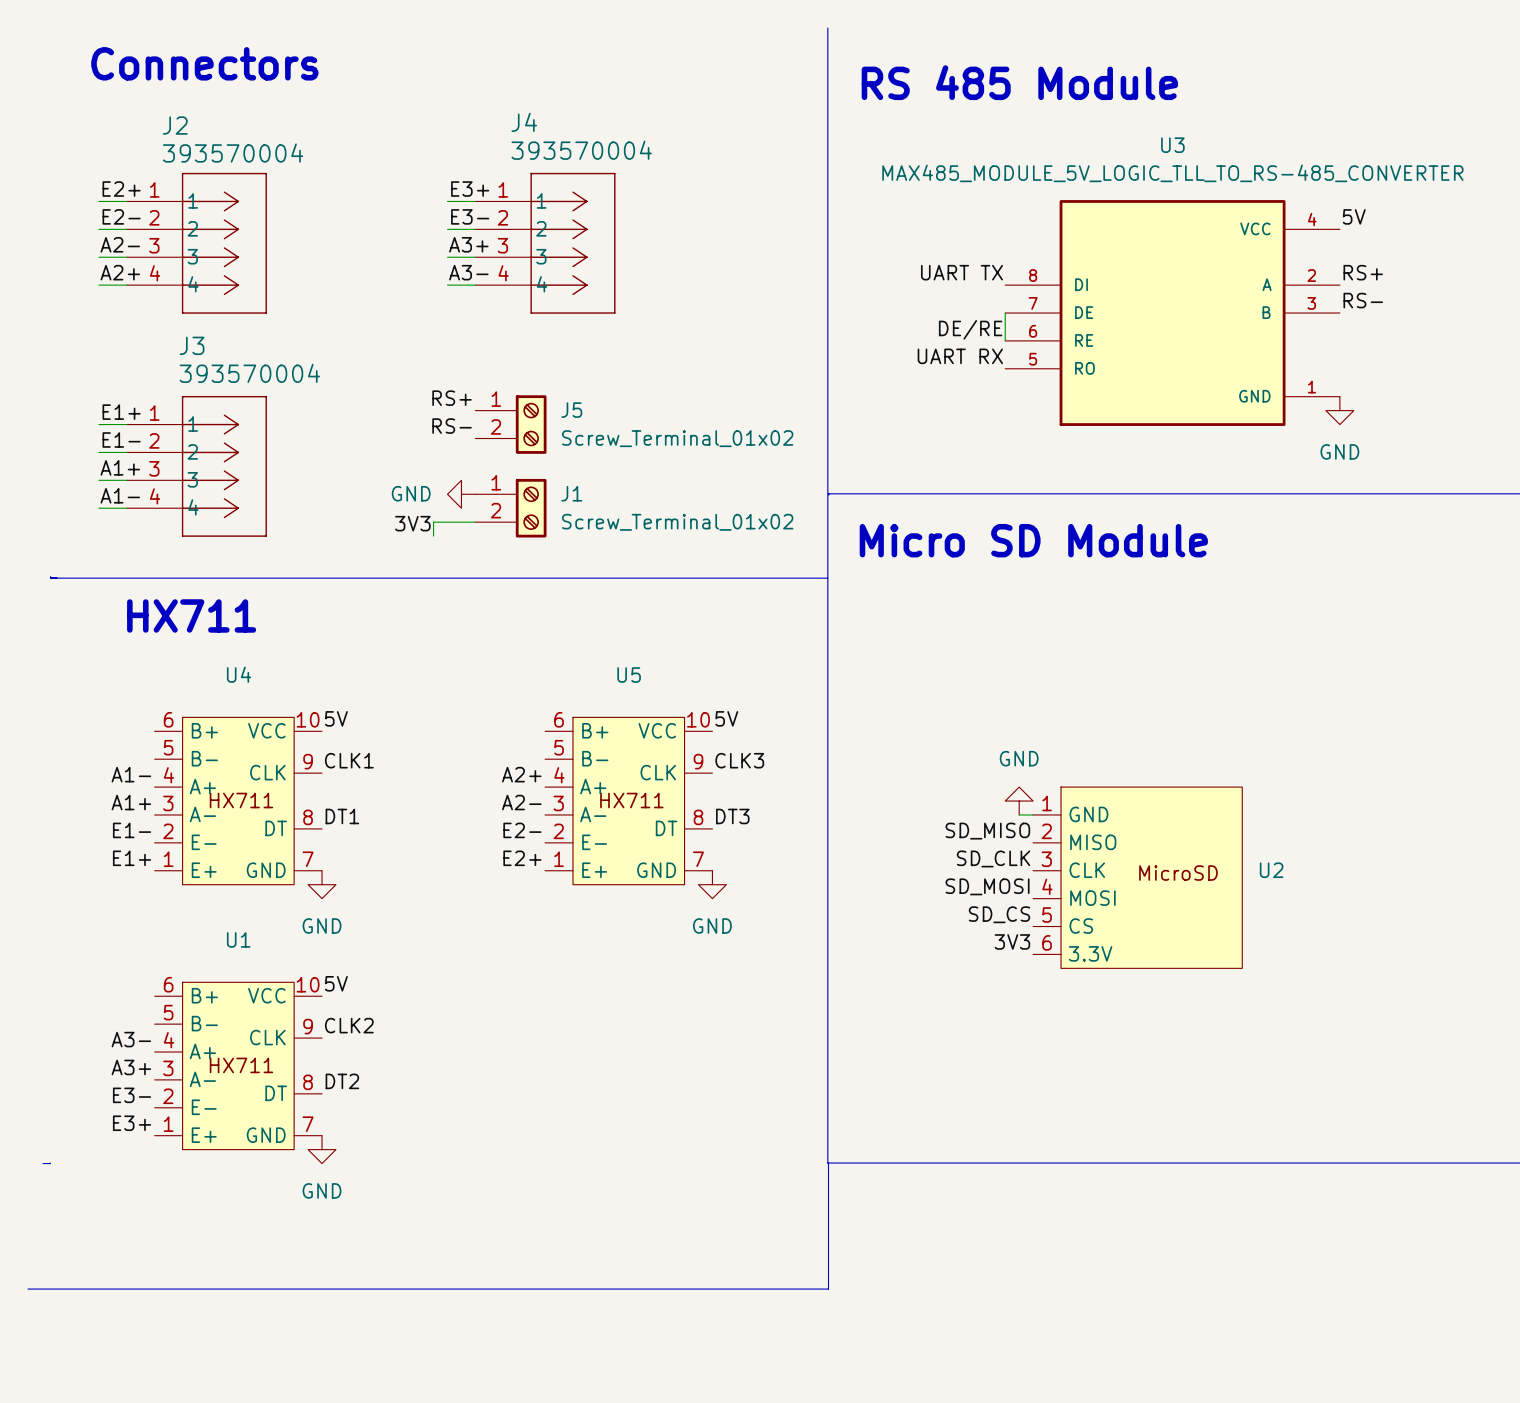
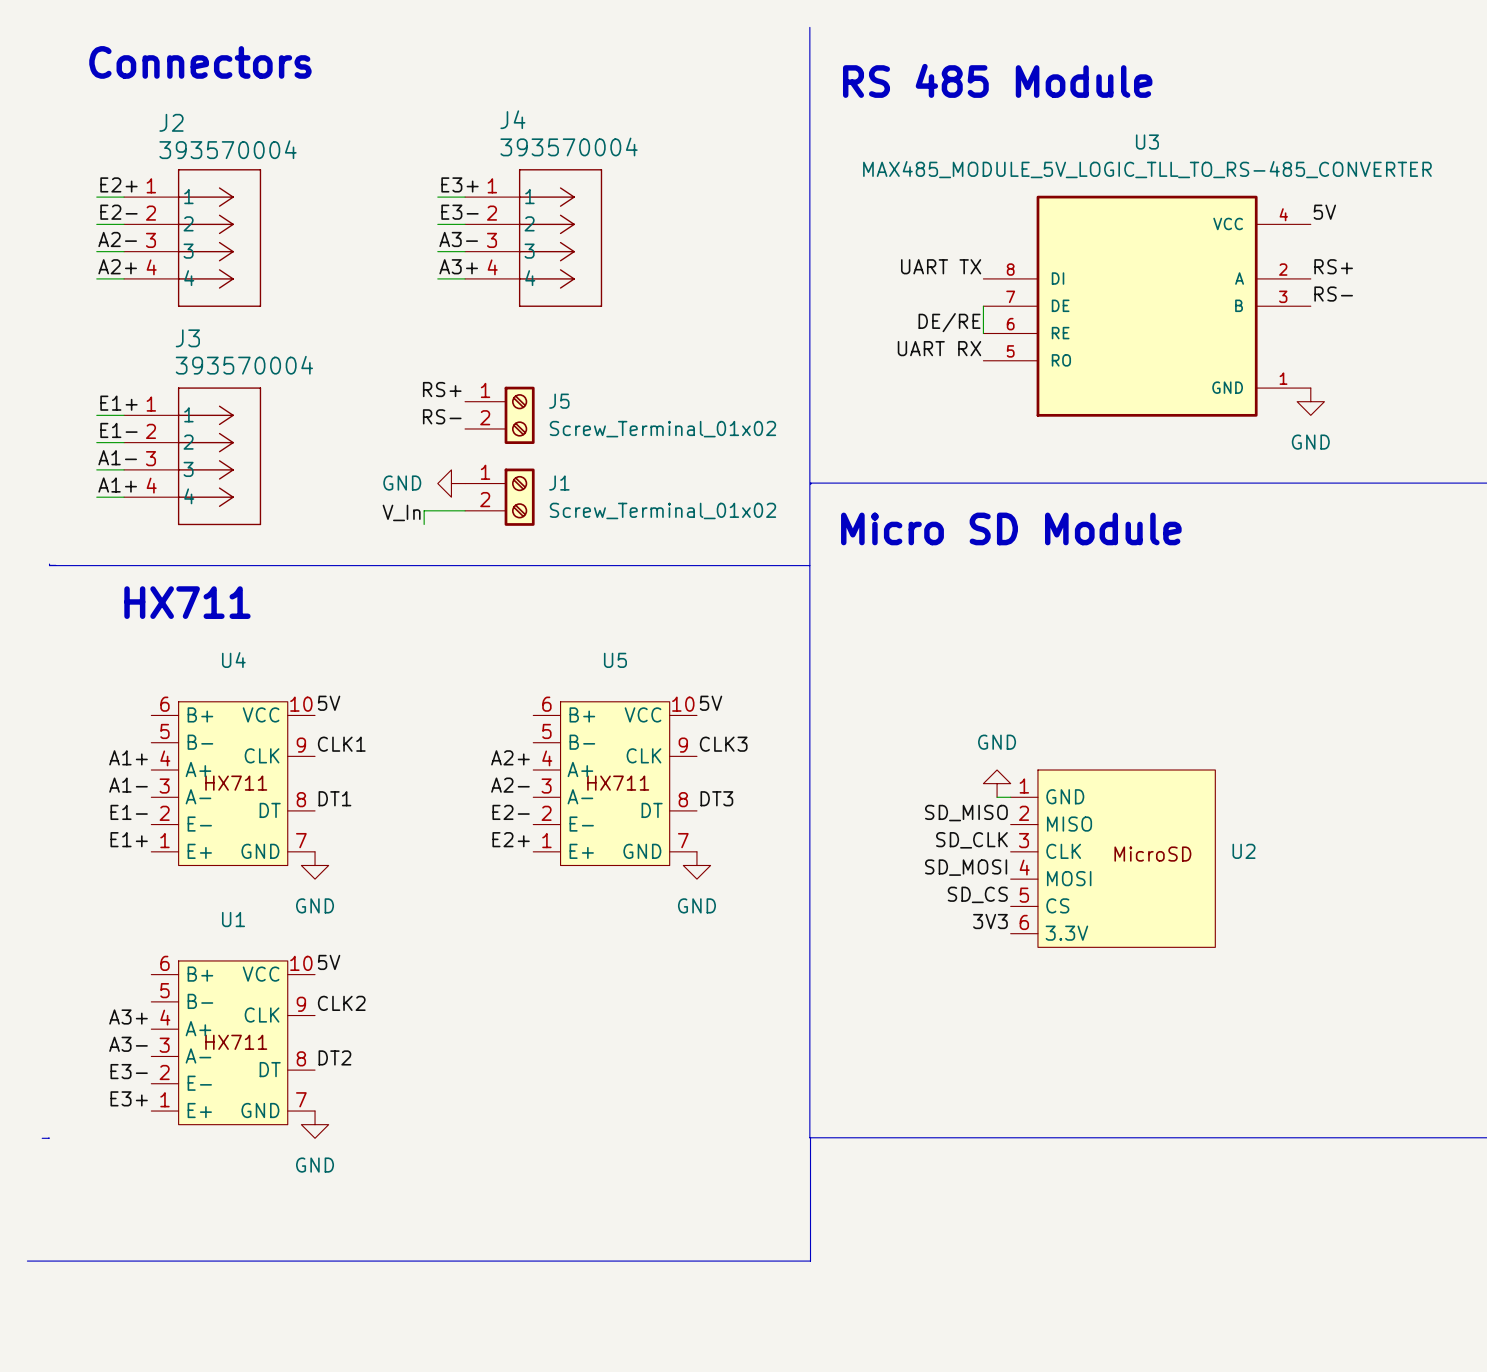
label: A3+ (468, 244) -> A3- (458, 239)
label: A3- (468, 272) -> A3+ (458, 266)
label: A1+ (120, 467) -> A1- (117, 457)
label: A1- (120, 495) -> A1+ (117, 485)
label: 3V3 (412, 523) -> V_In (401, 512)
label: A1- (131, 774) -> A1+ (128, 757)
label: A1+ (131, 802) -> A1- (128, 785)
label: A3- (131, 1039) -> A3+ (128, 1017)
label: A3+ (131, 1067) -> A3- (128, 1044)

